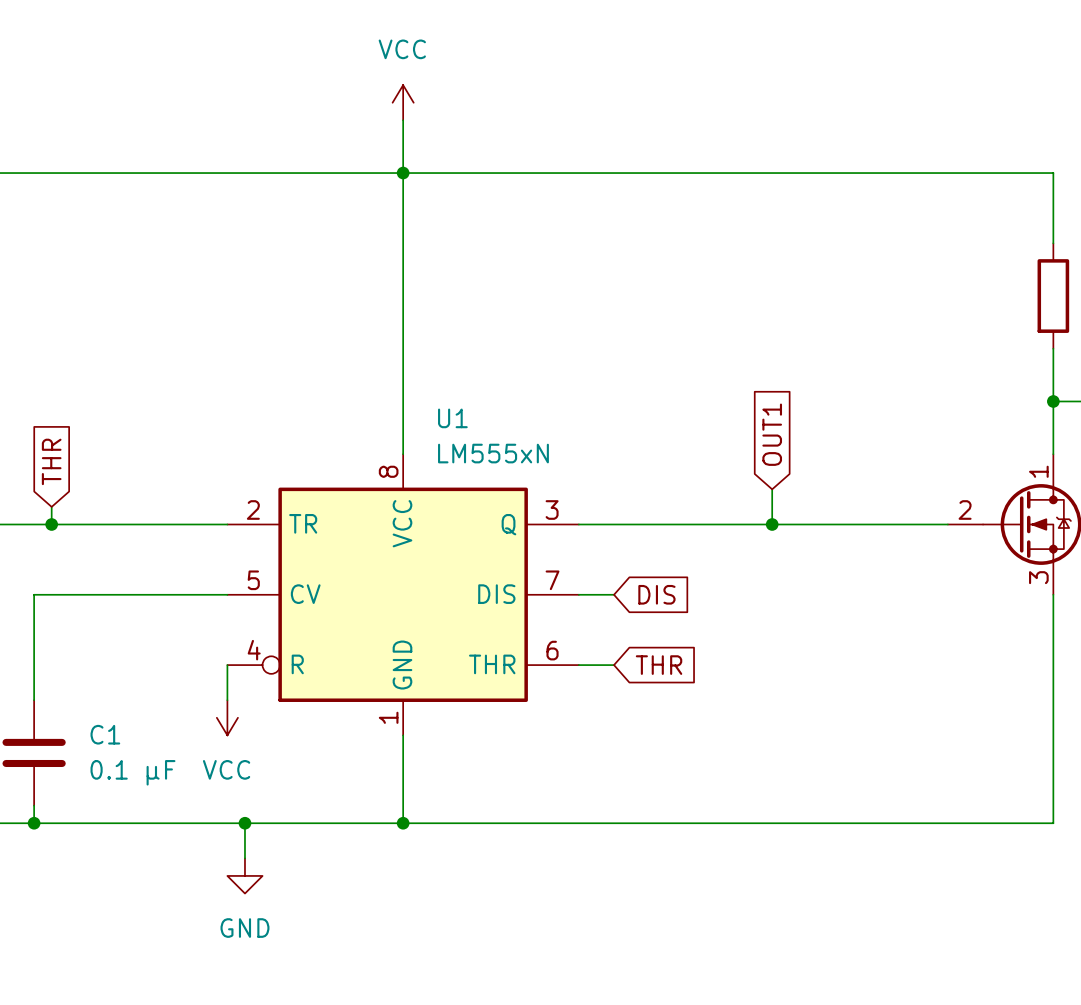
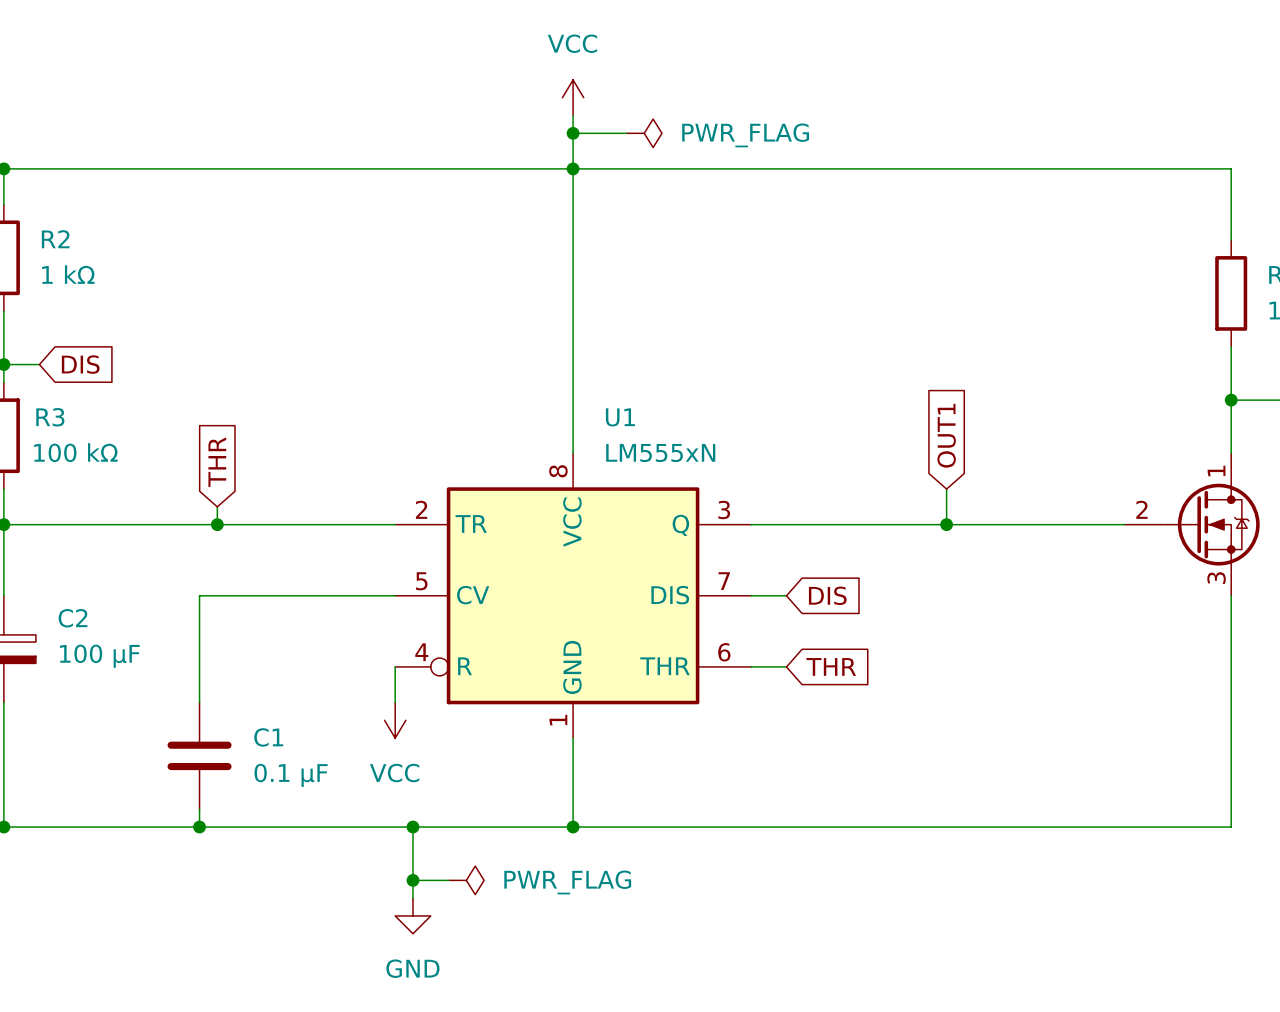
wire: none -> (573, 133) (626, 133)
junction: none -> (573, 133)
power symbol: none -> PWR_FLAG (644, 133)
wire: none -> (412, 880) (448, 880)
power symbol position: GND (244, 875) -> GND (412, 915)
junction: none -> (412, 880)
power symbol: none -> PWR_FLAG (466, 880)

